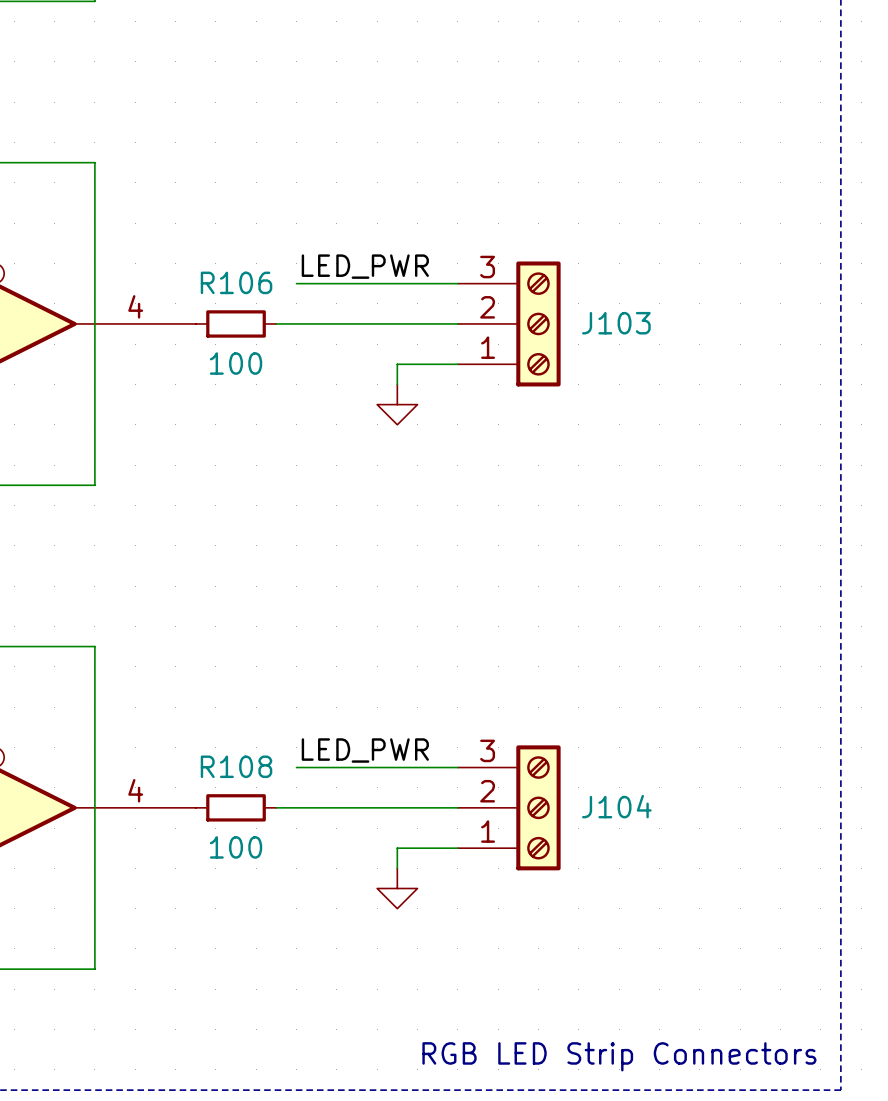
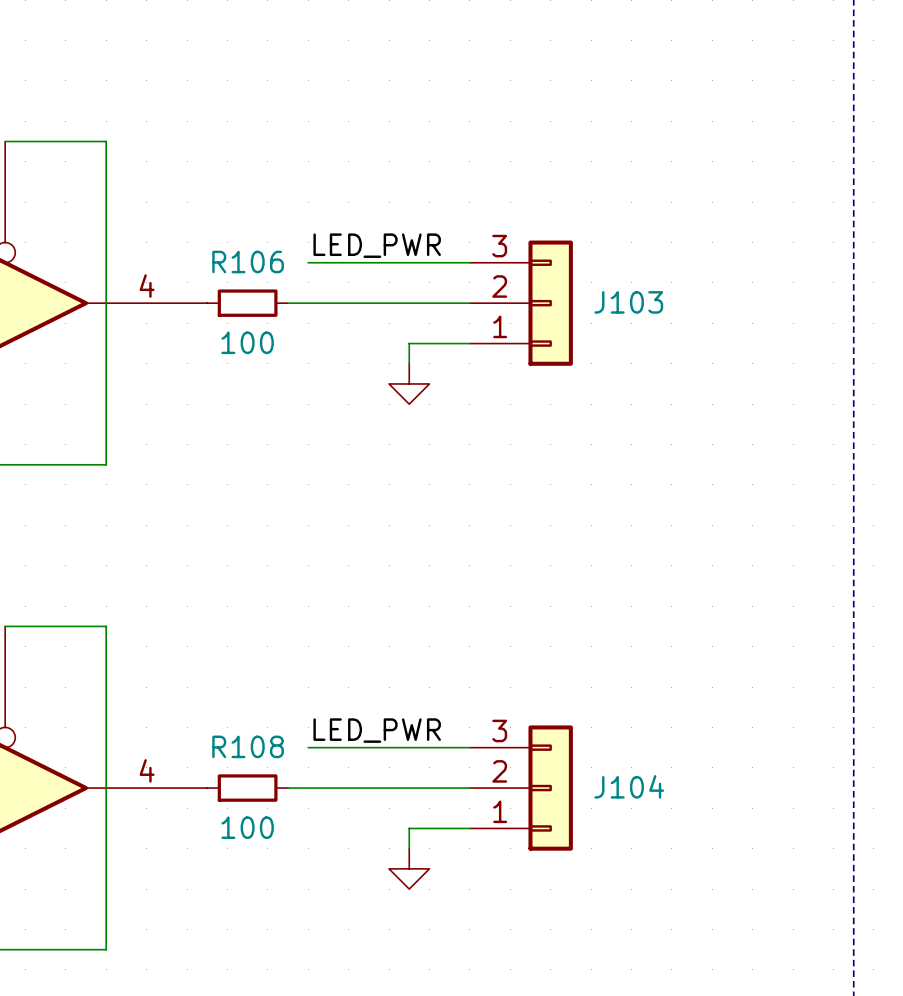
J103 symbol: [457, 261, 561, 387] -> [469, 240, 573, 366]
J104 symbol: [457, 745, 561, 871] -> [469, 725, 573, 851]

